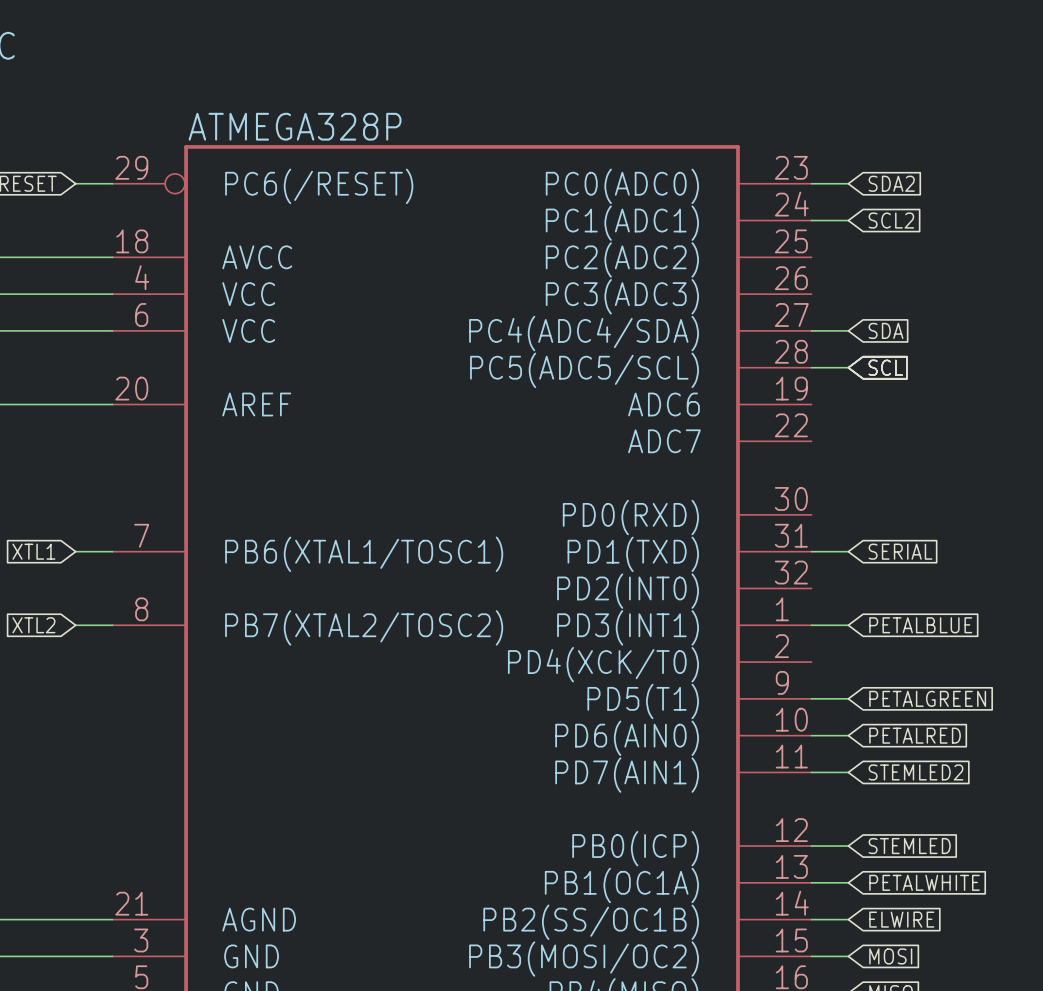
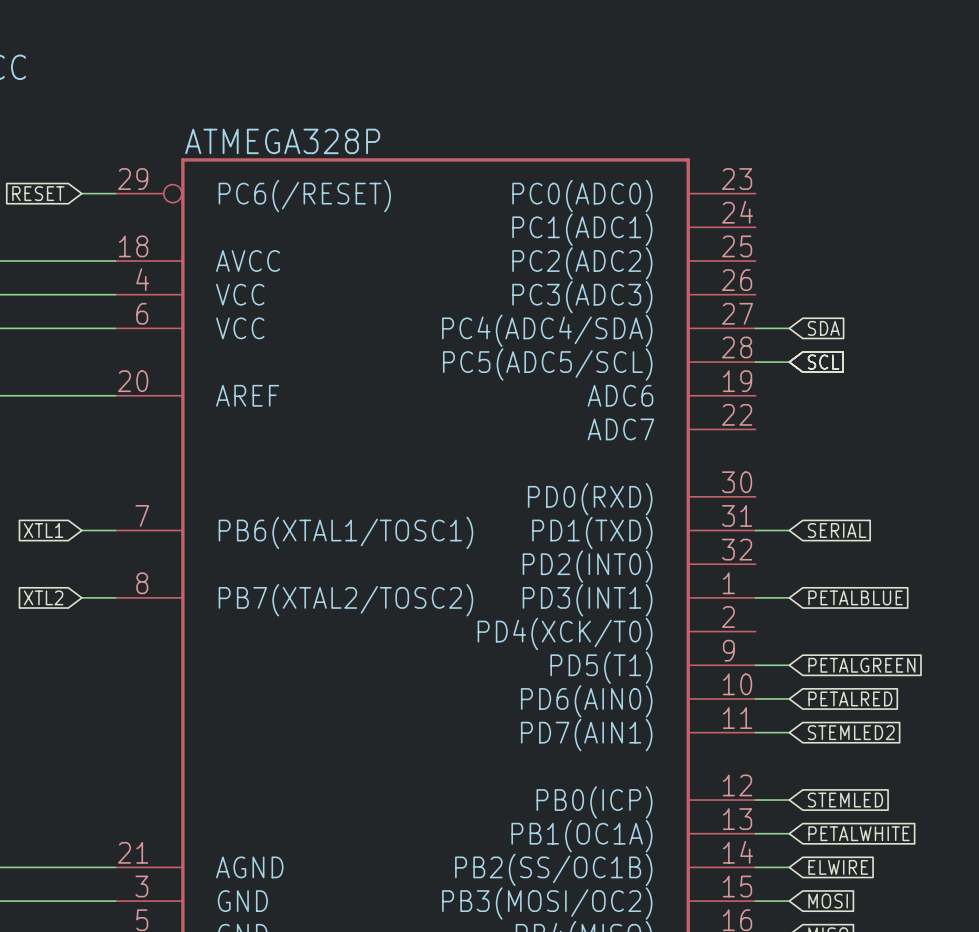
wire: (811, 183) (848, 183) -> none
global label: SDA2 (891, 183) -> none
wire: (811, 220) (848, 220) -> none
global label: SCL2 (891, 220) -> none

